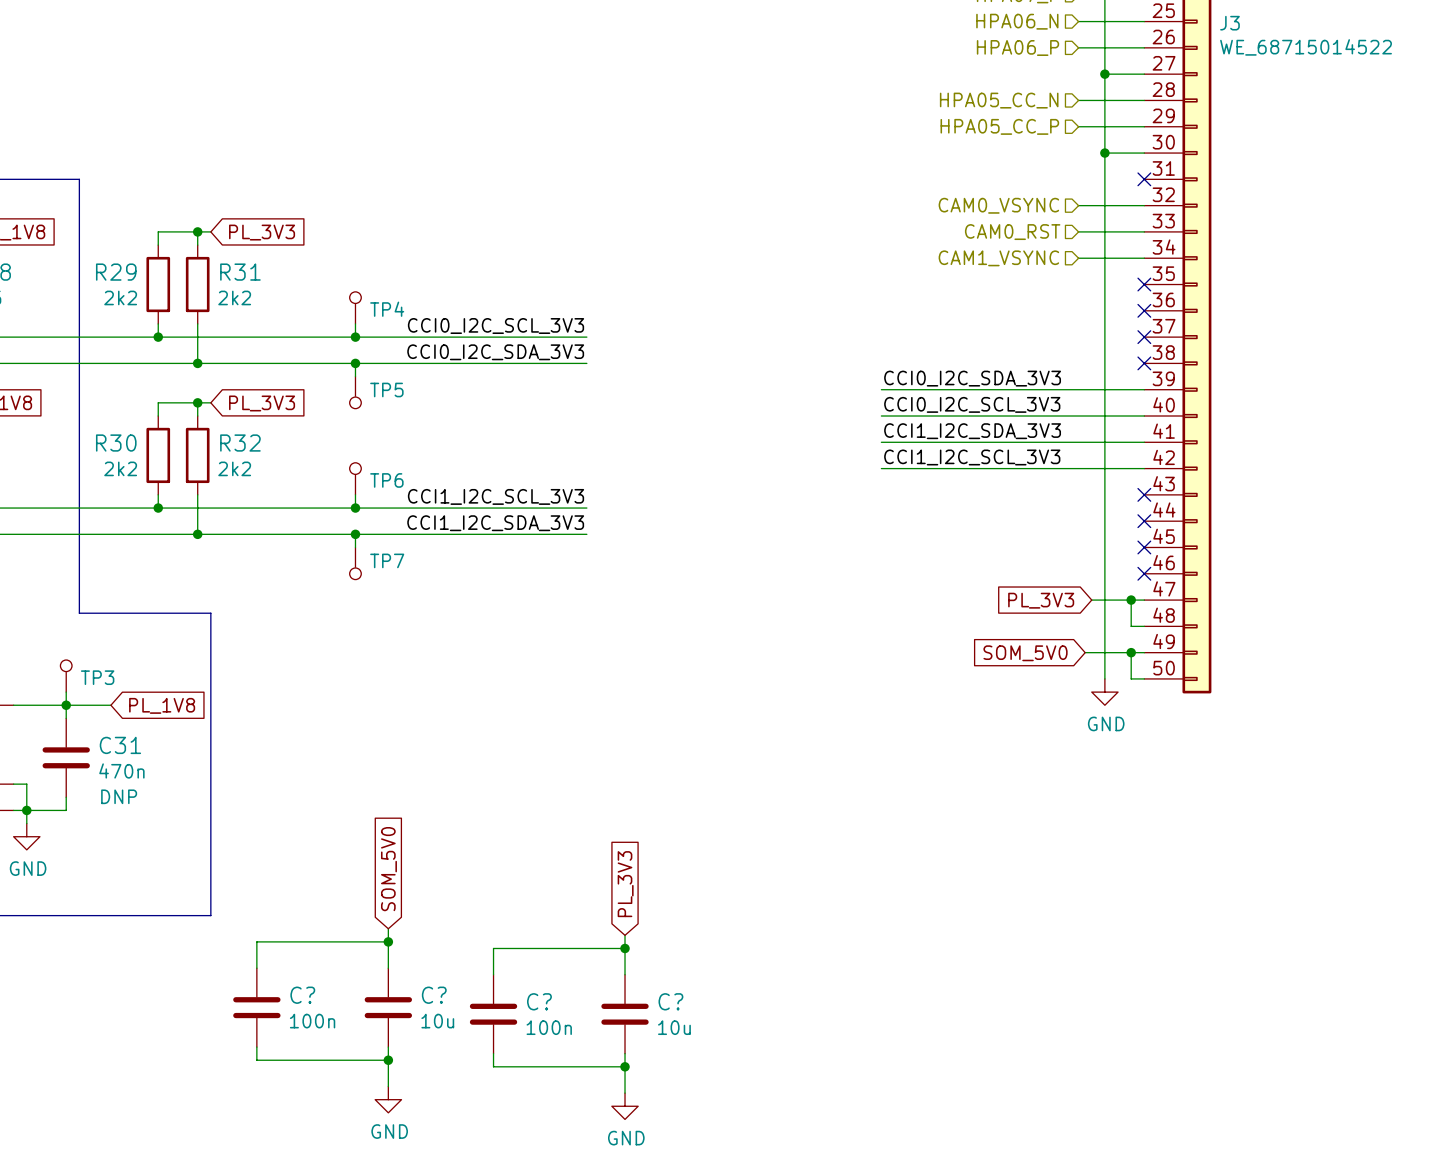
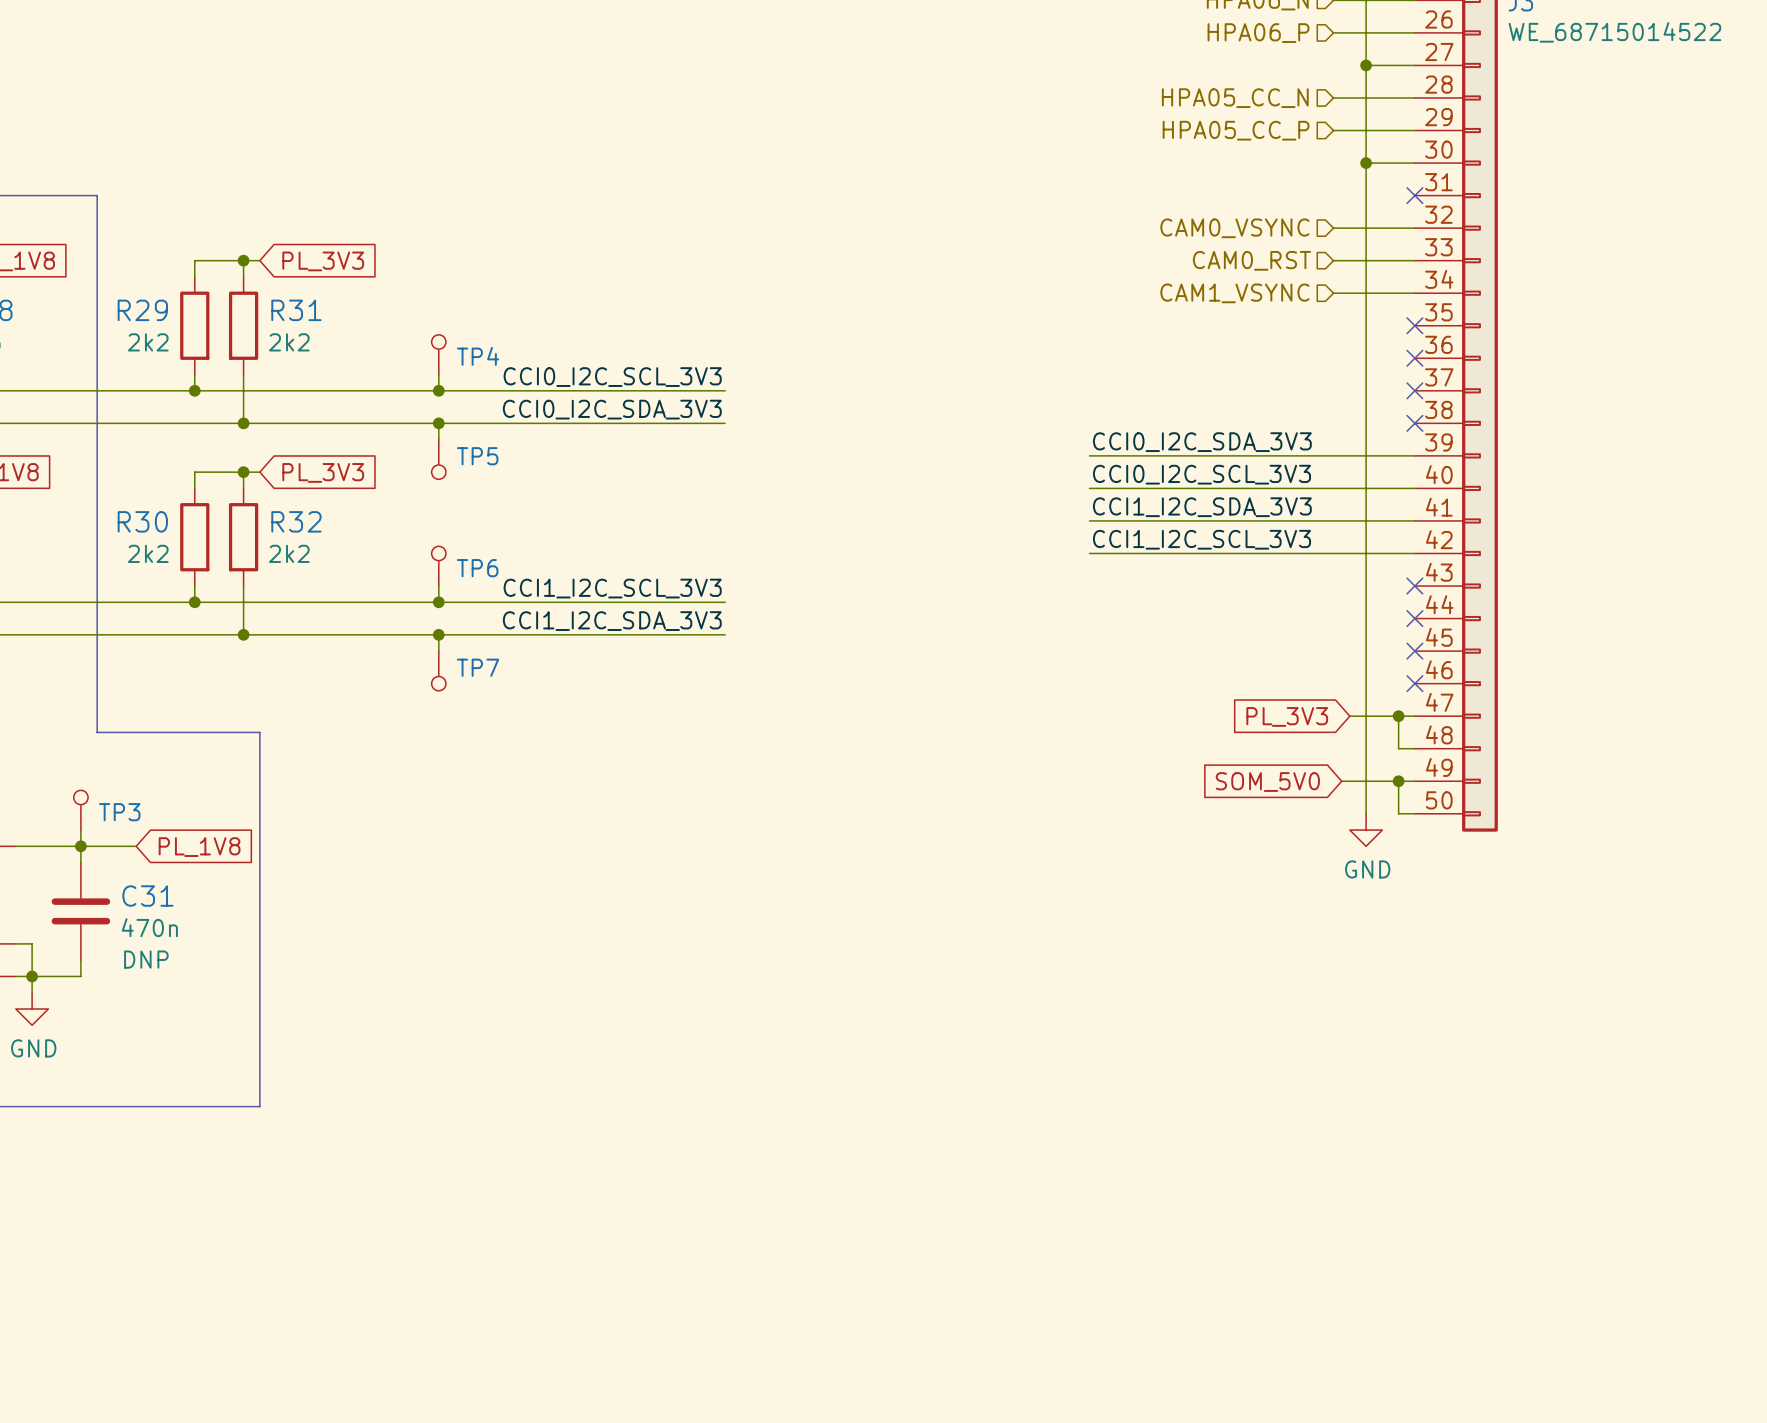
global label: SOM_5V0 (388, 869) -> none
global label: PL_3V3 (625, 884) -> none
wire: (388, 928) (388, 968) -> none
wire: (625, 935) (625, 974) -> none
wire: (388, 941) (256, 941) (256, 968) -> none
junction: (388, 941) -> none
wire: (625, 948) (493, 948) (493, 974) -> none
junction: (625, 948) -> none
C?: (256, 1007) -> none
C?: (388, 1007) -> none
C?: (493, 1014) -> none
C?: (625, 1014) -> none
wire: (256, 1047) (256, 1060) (388, 1060) -> none
wire: (388, 1047) (388, 1086) -> none
wire: (493, 1053) (493, 1066) (625, 1066) -> none
wire: (625, 1053) (625, 1093) -> none
junction: (388, 1060) -> none
junction: (625, 1066) -> none
power symbol: GND (388, 1099) -> none
power symbol: GND (625, 1106) -> none

